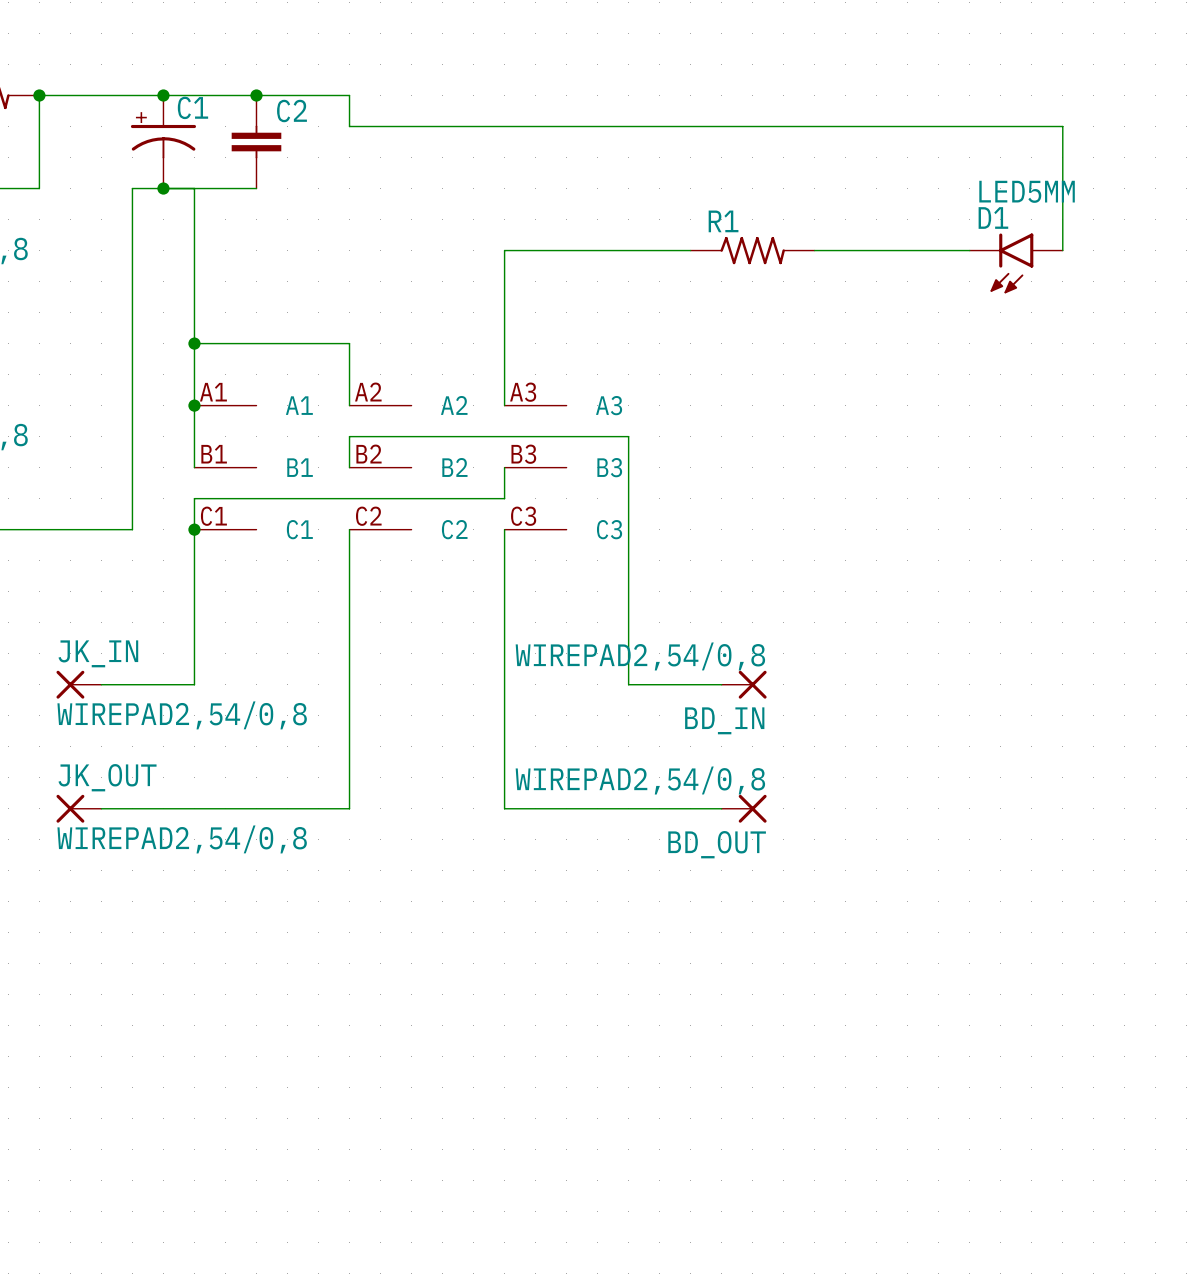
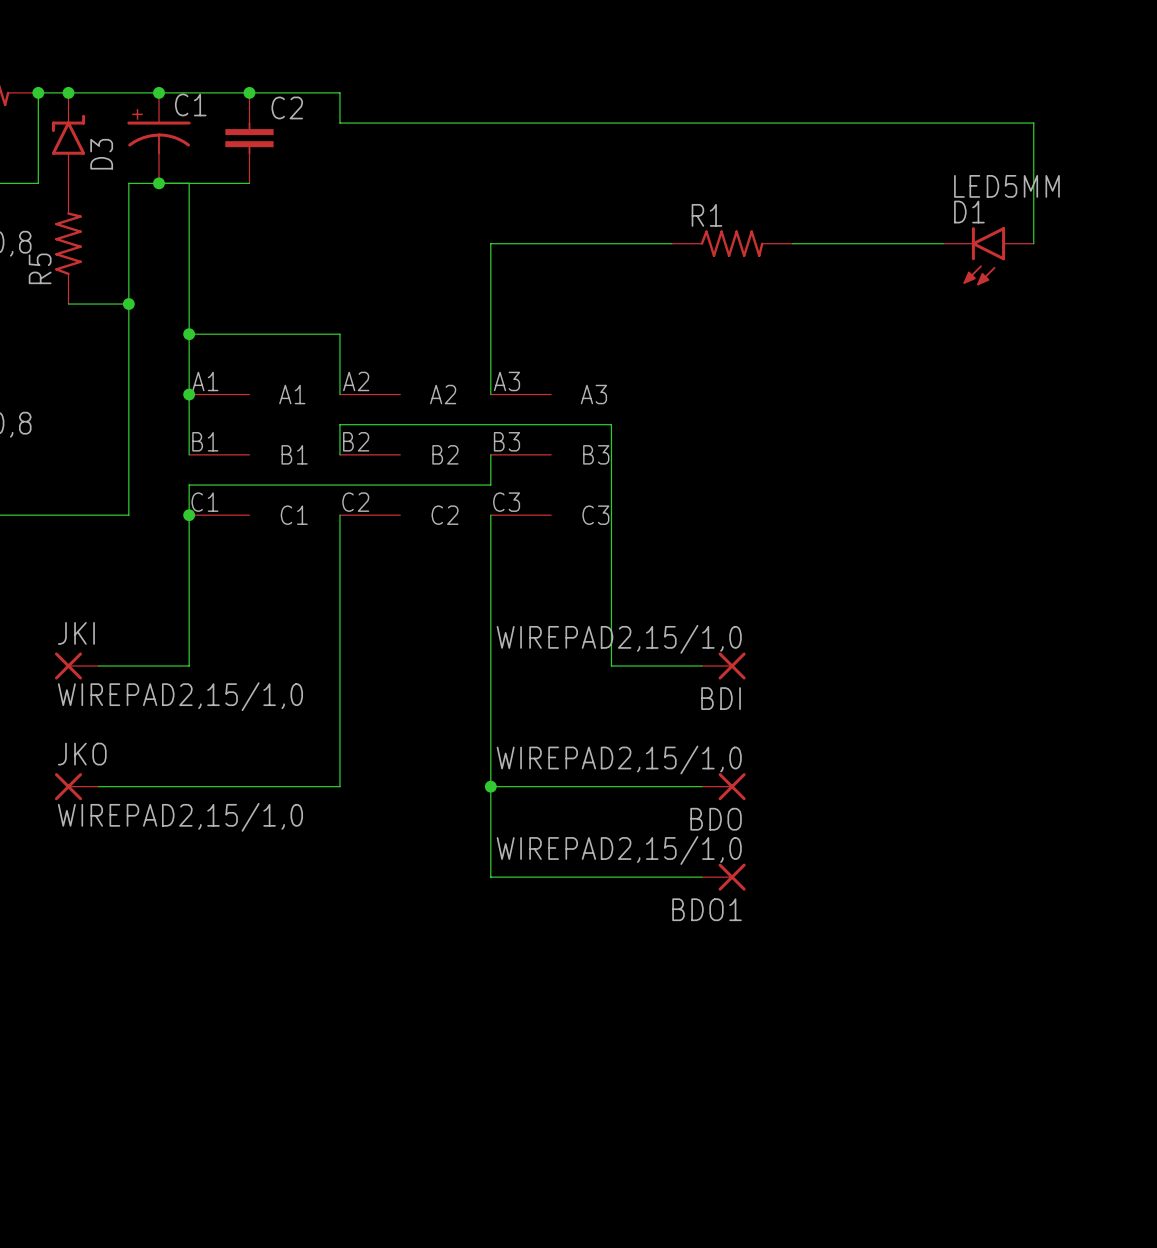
junction: none -> (68, 92)
D3: none -> (68, 138)
R5: none -> (68, 243)
wire: none -> (68, 304) (128, 304)
junction: none -> (128, 304)
JK_IN name: JK_IN (98, 653) -> JKI (76, 633)
BD_IN value: WIREPAD2,54/0,8 (640, 656) -> WIREPAD2,15/1,0 (619, 639)
JK_IN value: WIREPAD2,54/0,8 (182, 715) -> WIREPAD2,15/1,0 (180, 696)
BD_IN name: BD_IN (724, 720) -> BDI (721, 698)
JK_OUT name: JK_OUT (107, 777) -> JKO (82, 754)
BD_OUT value: WIREPAD2,54/0,8 (640, 780) -> WIREPAD2,15/1,0 (619, 760)
wire: none -> (490, 786) (490, 877) (701, 877)
junction: none -> (490, 786)
JK_OUT value: WIREPAD2,54/0,8 (182, 839) -> WIREPAD2,15/1,0 (180, 817)
BD_OUT name: BD_OUT (717, 844) -> BDO (716, 819)
BDO1: none -> WIREPAD2,15/1,0 (723, 877)

